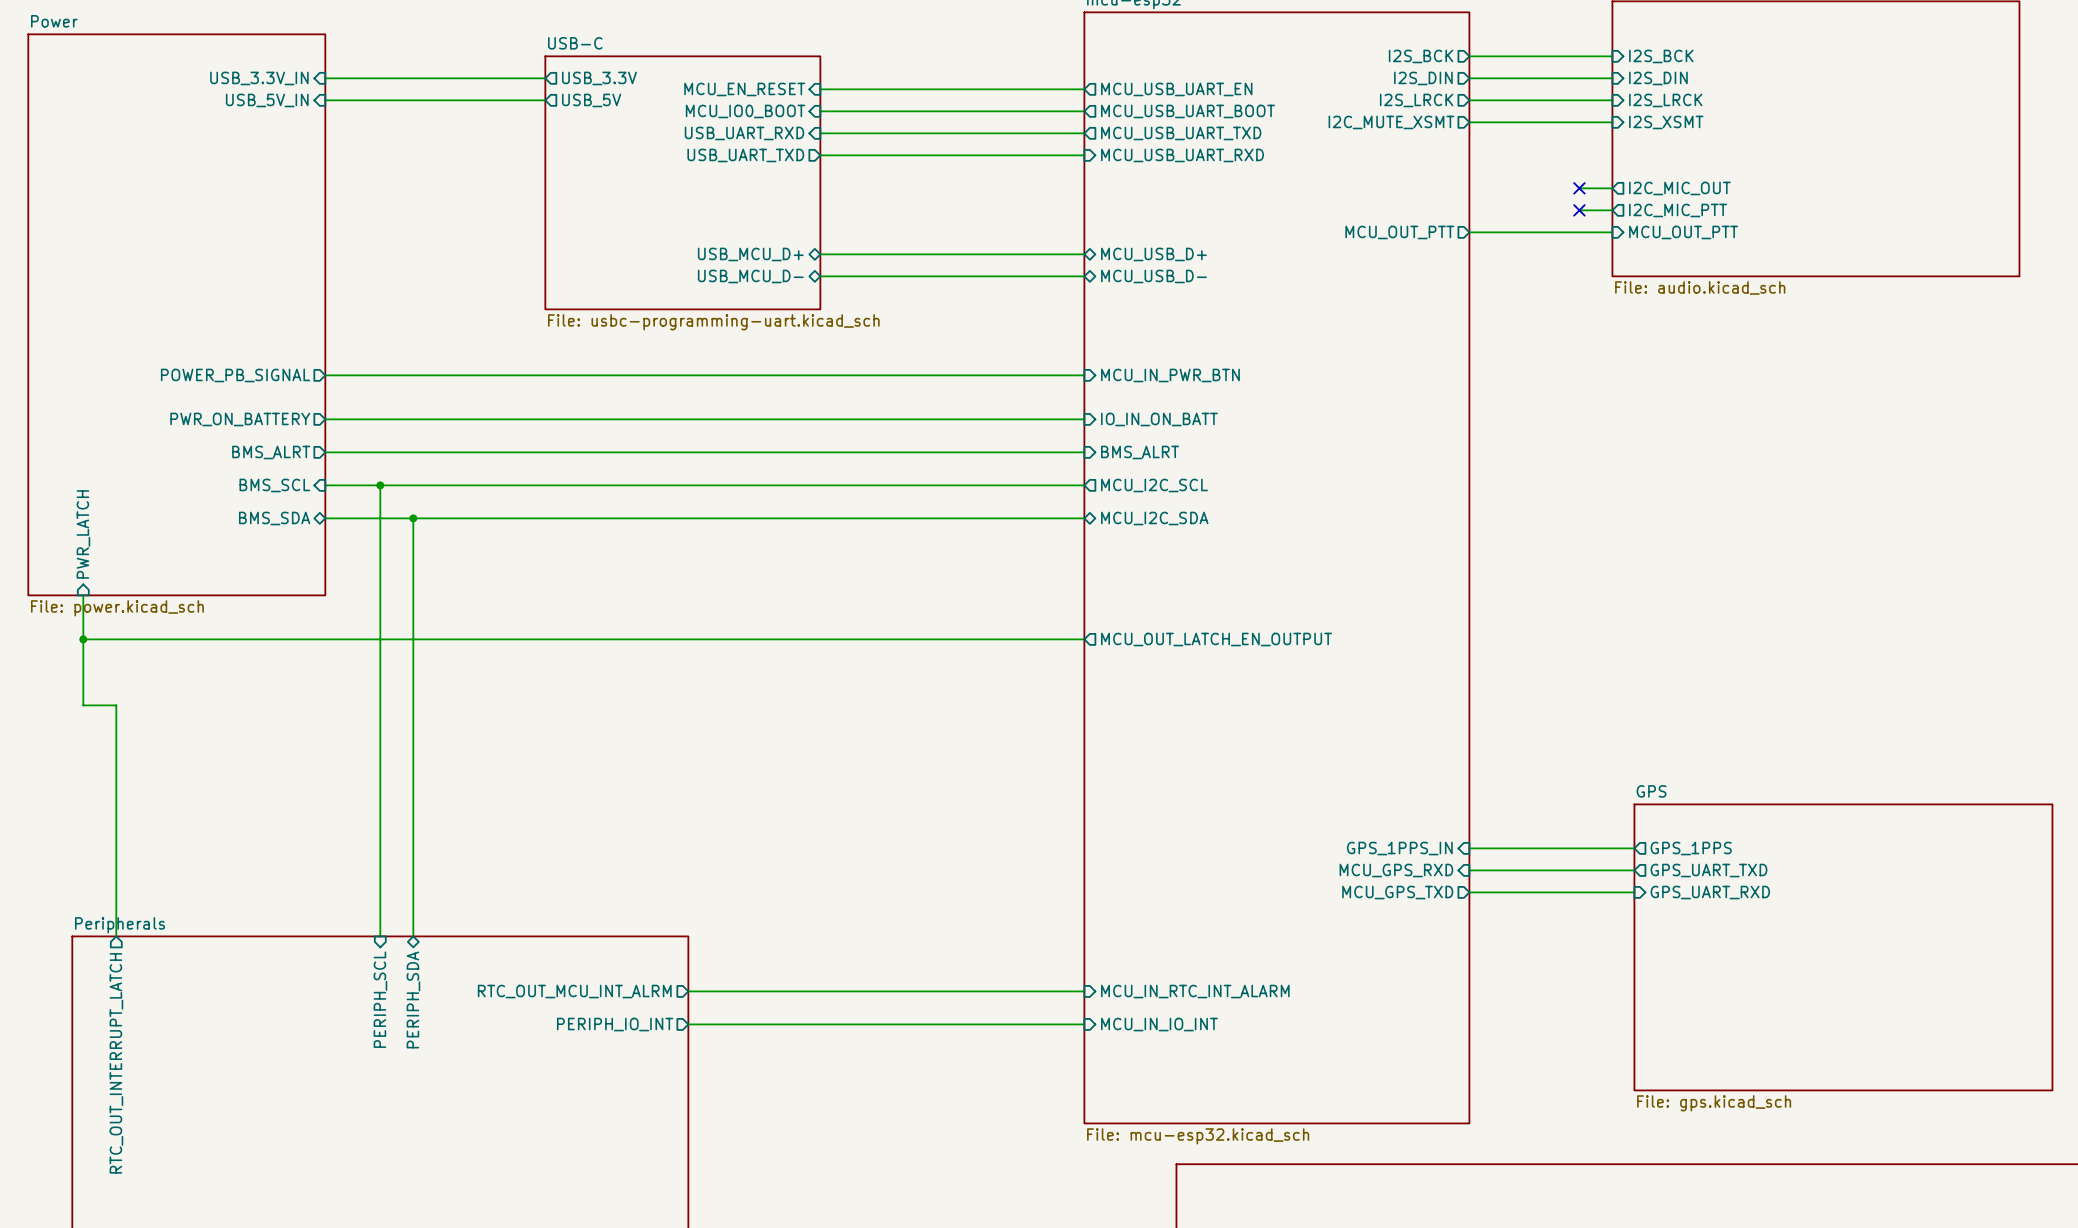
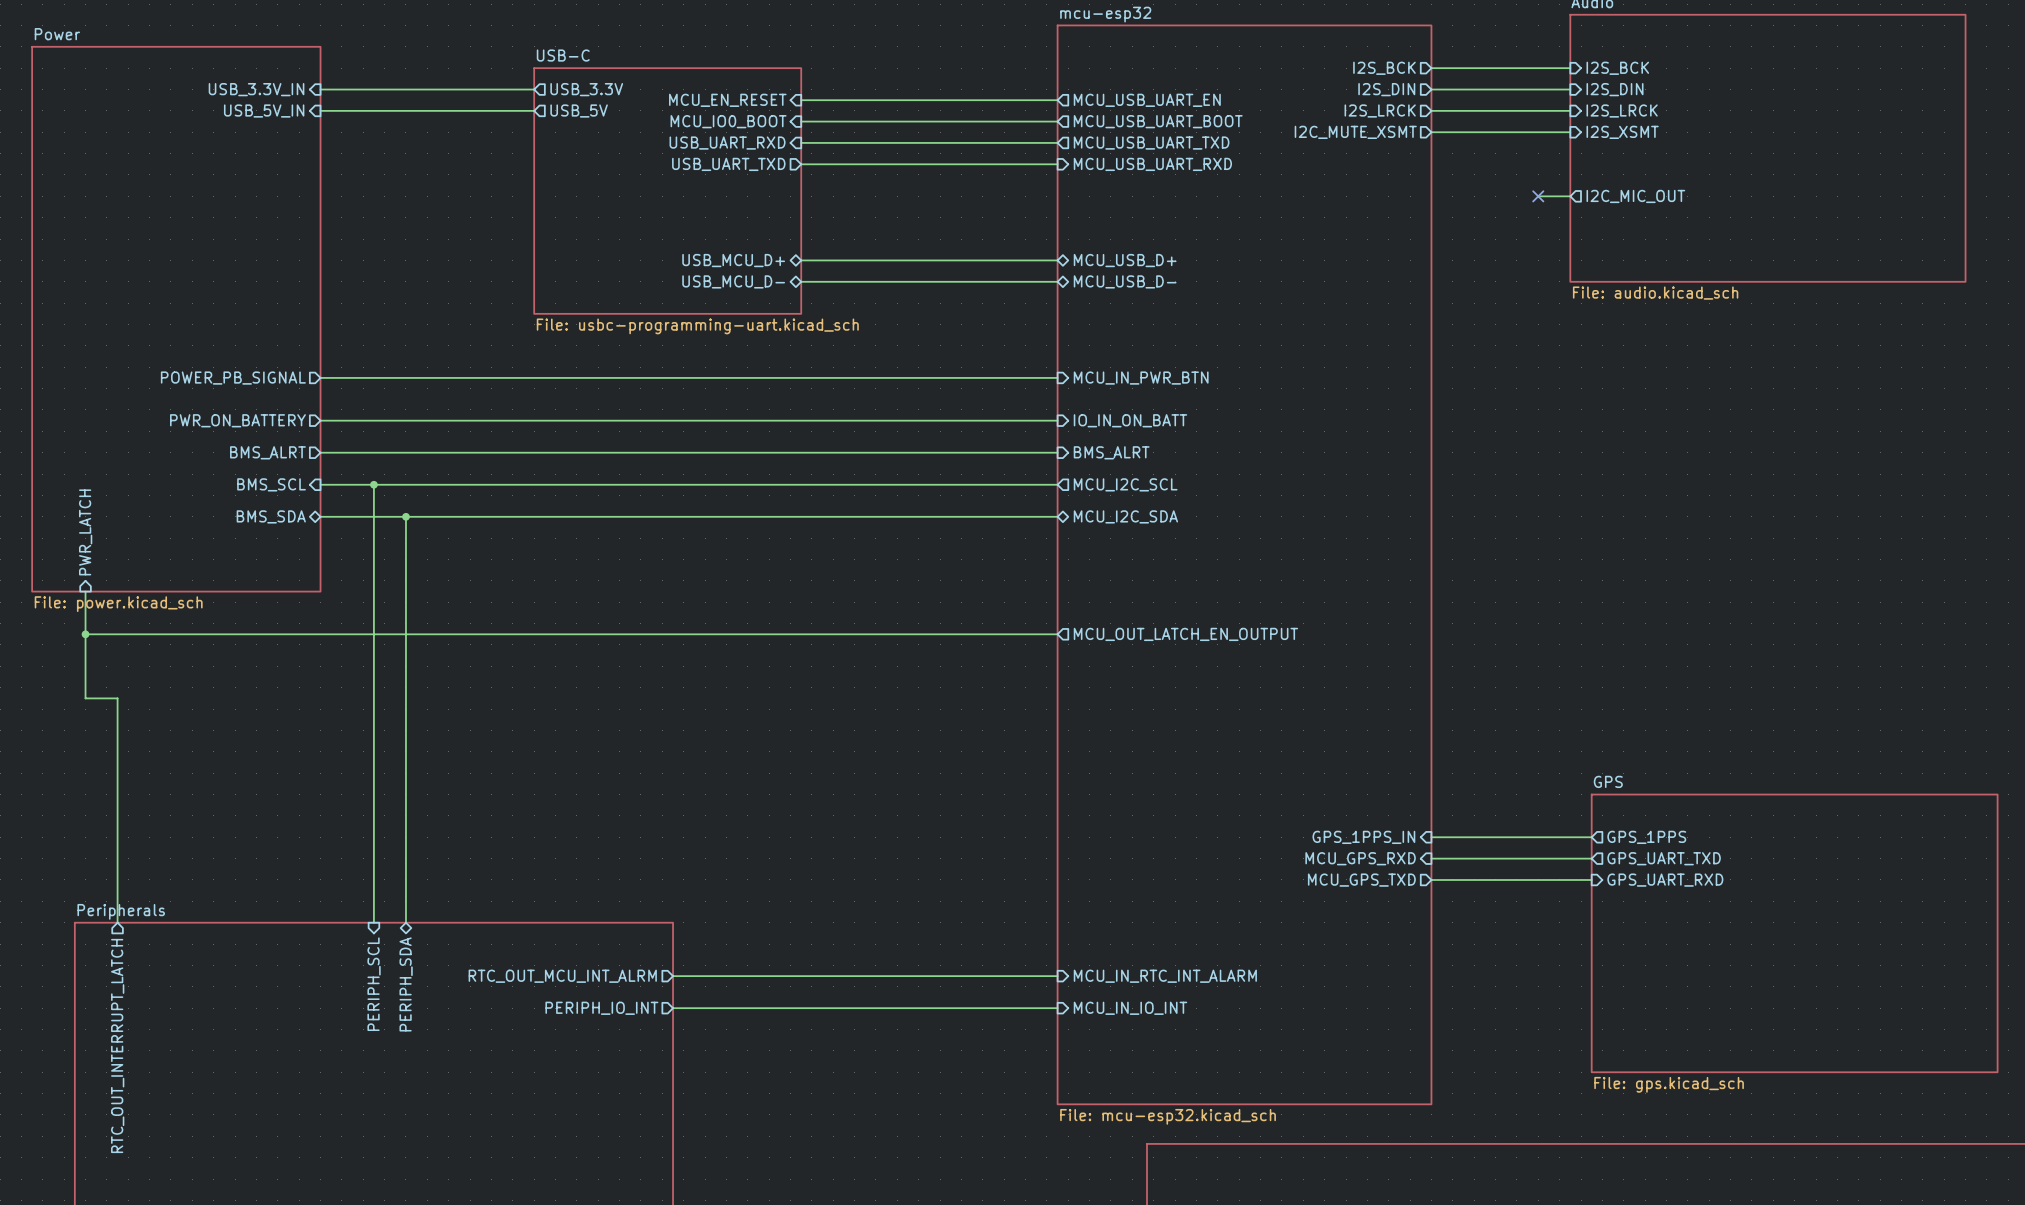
wire: (1579, 210) (1612, 210) -> none
no-connect mark: (1579, 210) -> none
sheet pin: I2C_MIC_PTT (1678, 210) -> none
sheet pin: MCU_OUT_PTT (1399, 232) -> none
wire: (1469, 232) (1612, 232) -> none
sheet pin: MCU_OUT_PTT (1683, 232) -> none

